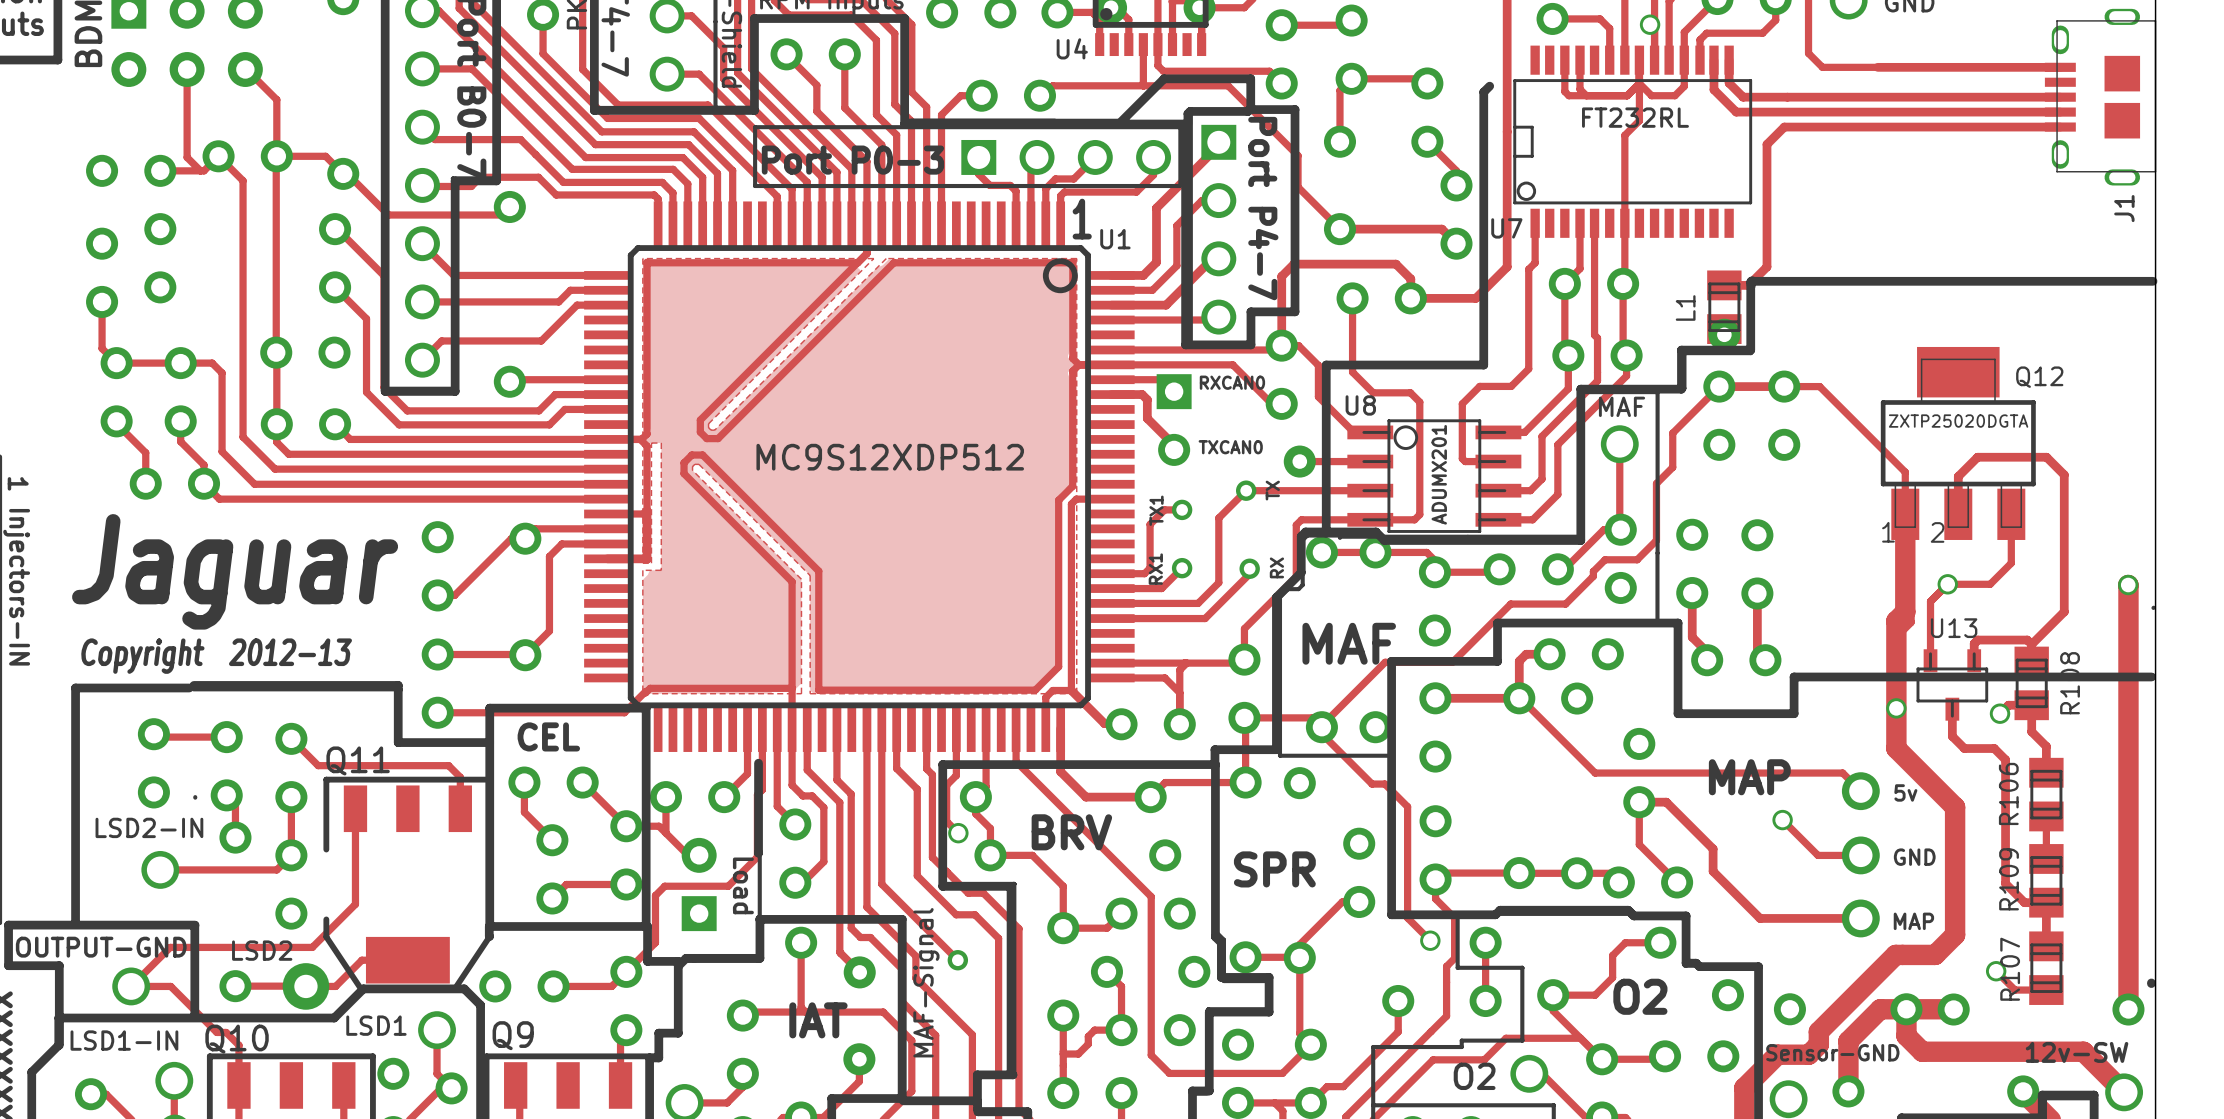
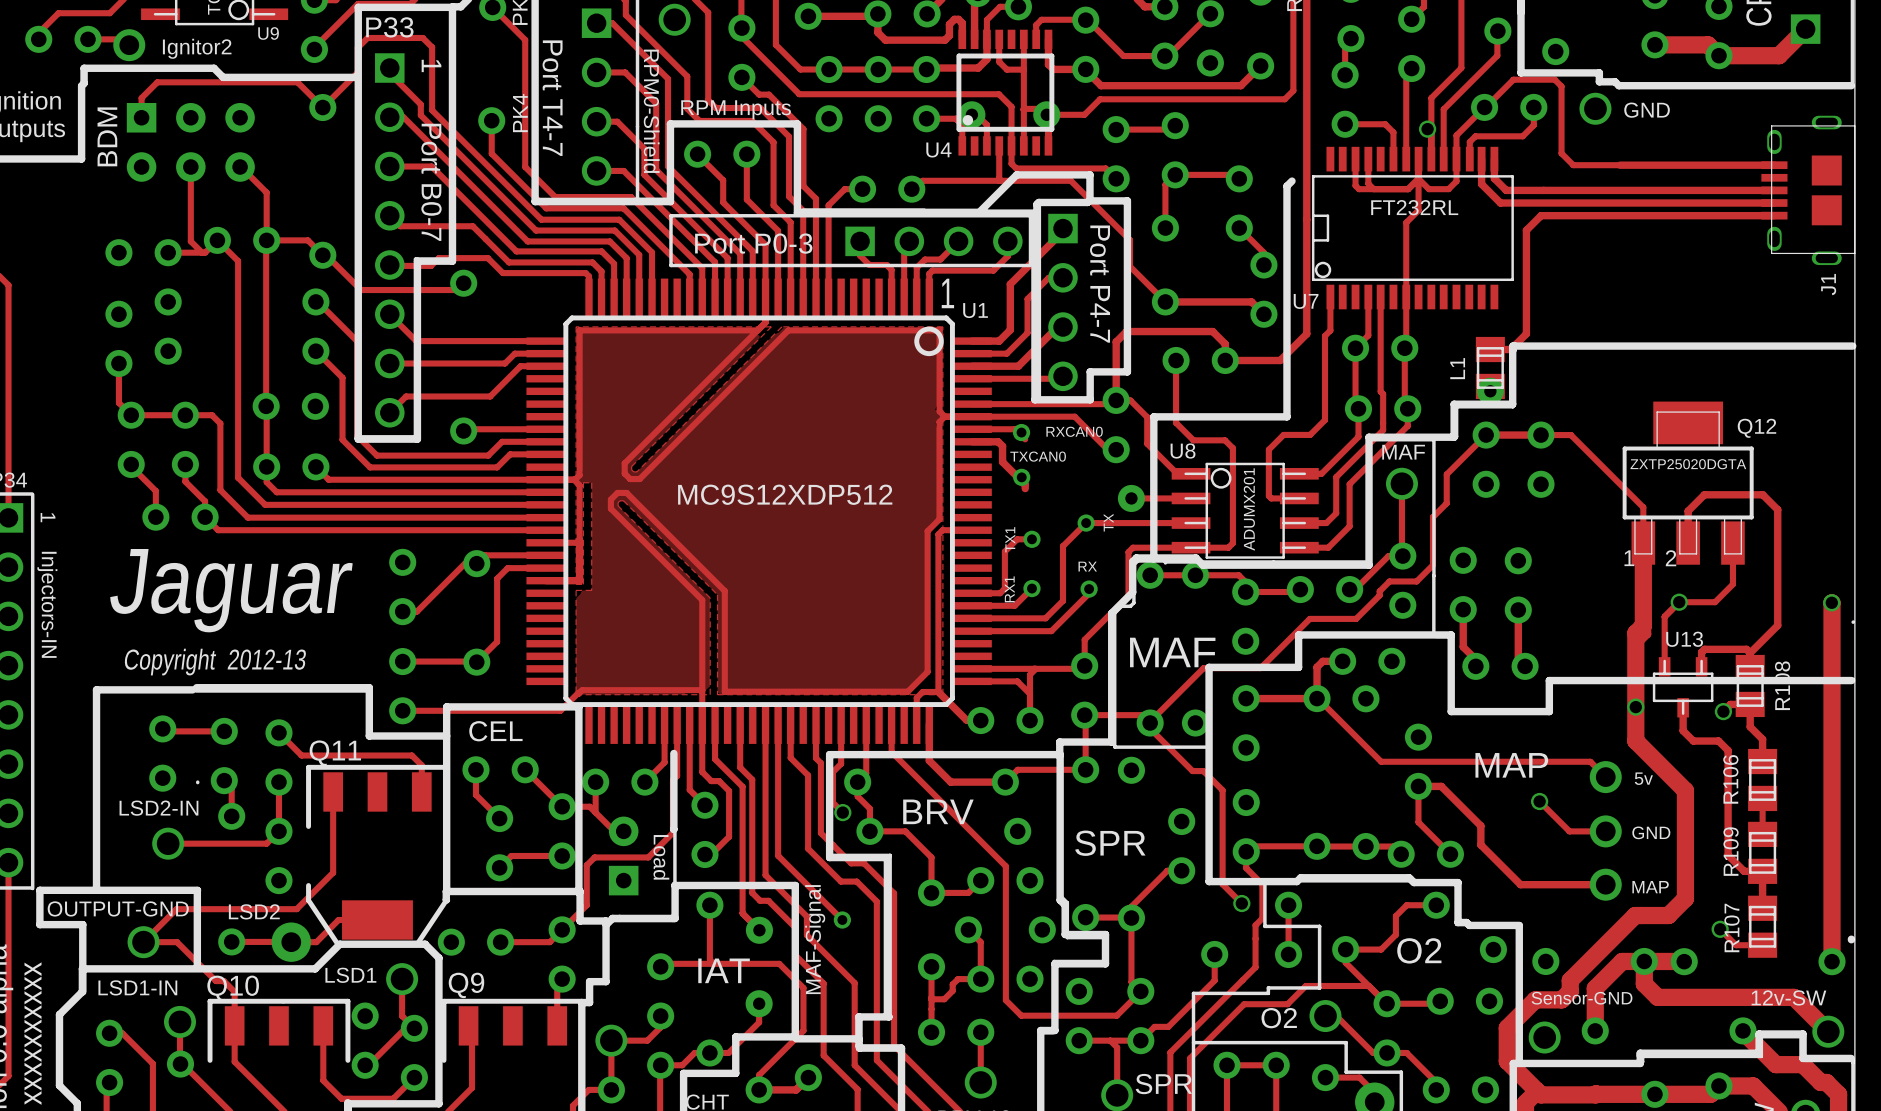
part footprint: [1156, 374, 1192, 466] -> [1013, 468, 1031, 486]
part: none -> (1021, 432)
text position: TXCAN0 (1230, 447) -> TXCAN0 (1038, 456)
text rotation: 0° (1276, 567) -> 90° clockwise (1087, 566)
text position: RX (1276, 567) -> RX (1087, 566)

